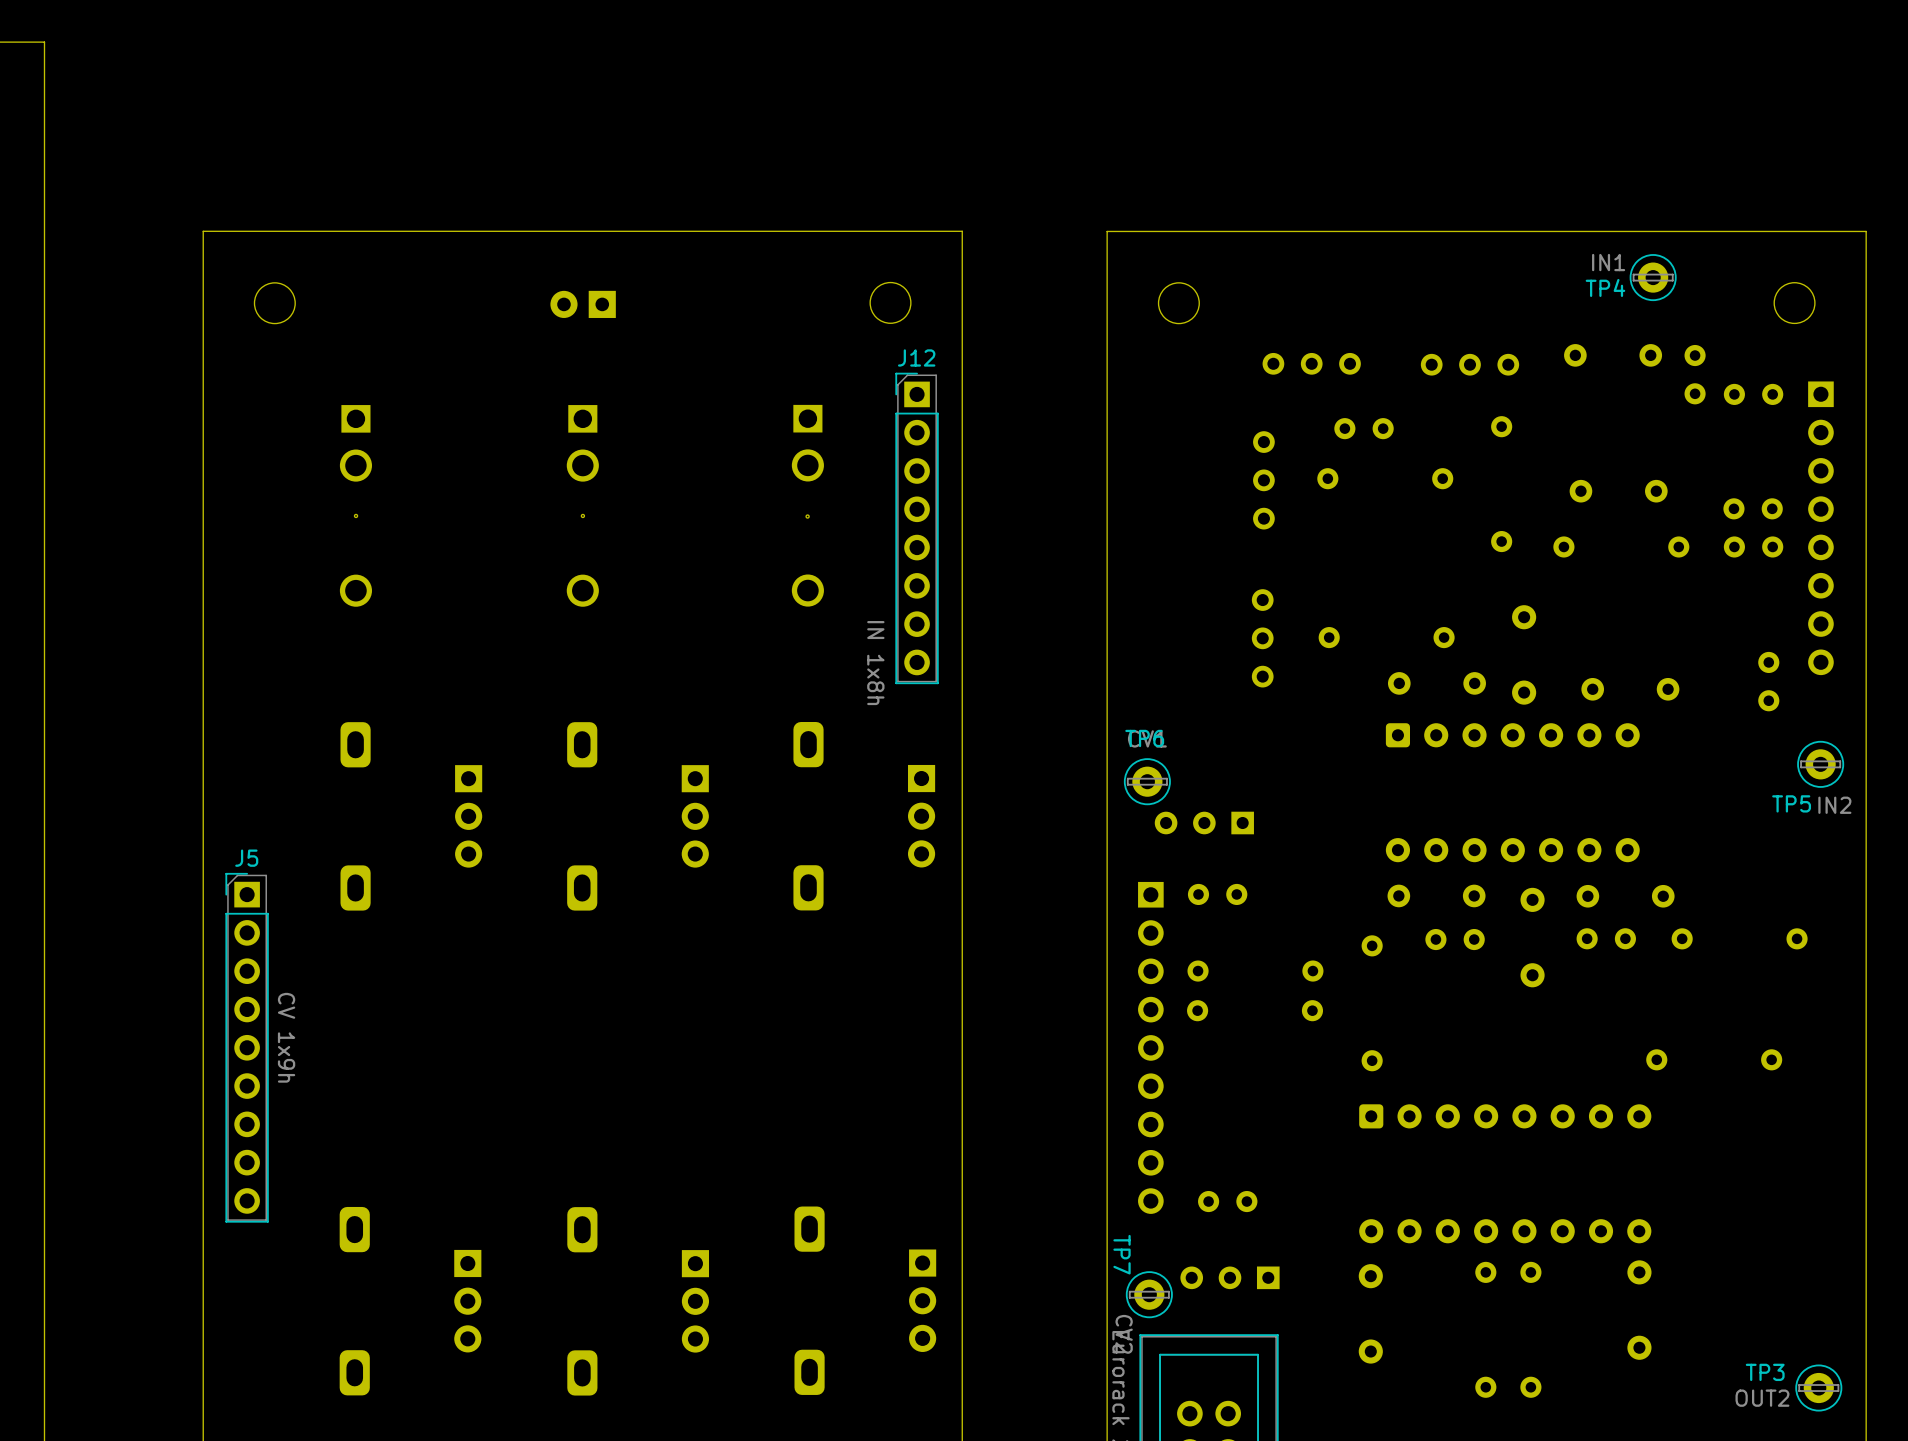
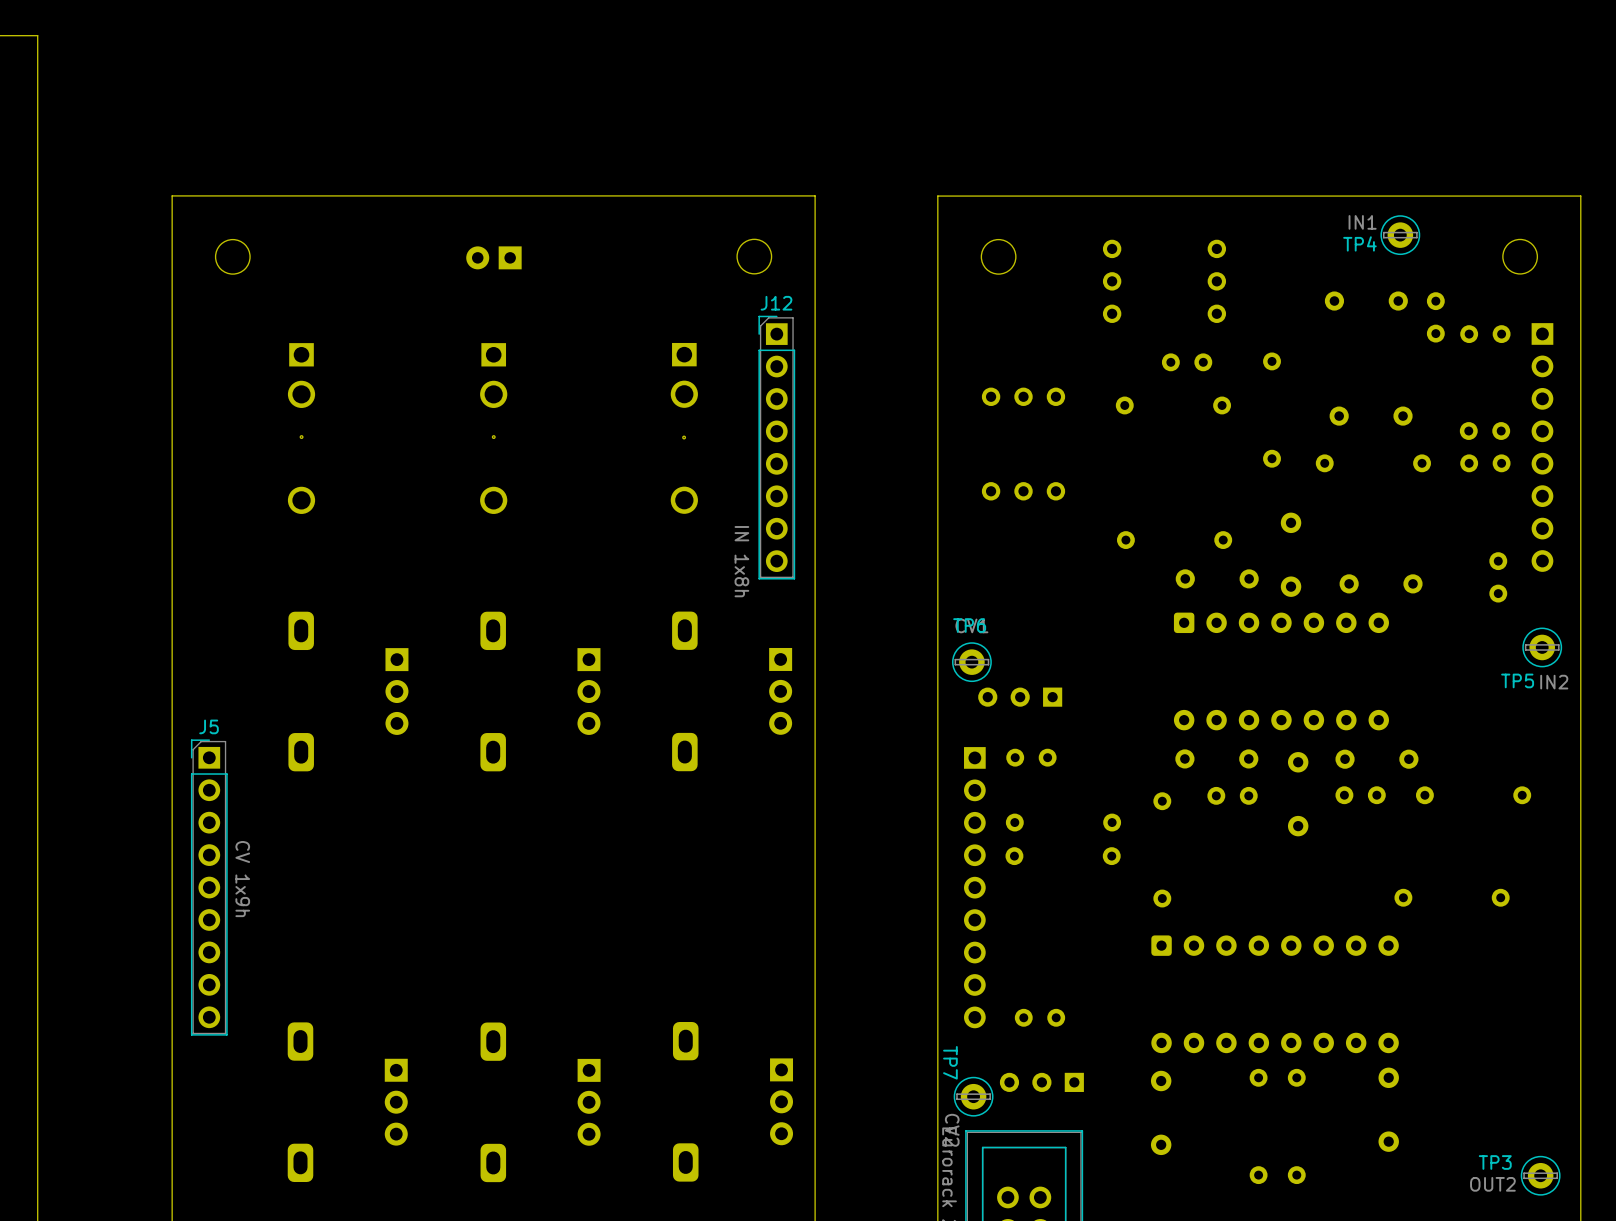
part rotation: 0° (1311, 363) -> 90° clockwise (1112, 281)
part rotation: 0° (1469, 364) -> 90° clockwise (1216, 281)
part position: (1364, 428) -> (1187, 362)
part rotation: 0° (1263, 480) -> 90° clockwise (1023, 396)
part: none -> (1023, 491)
part: (1262, 638) -> none

